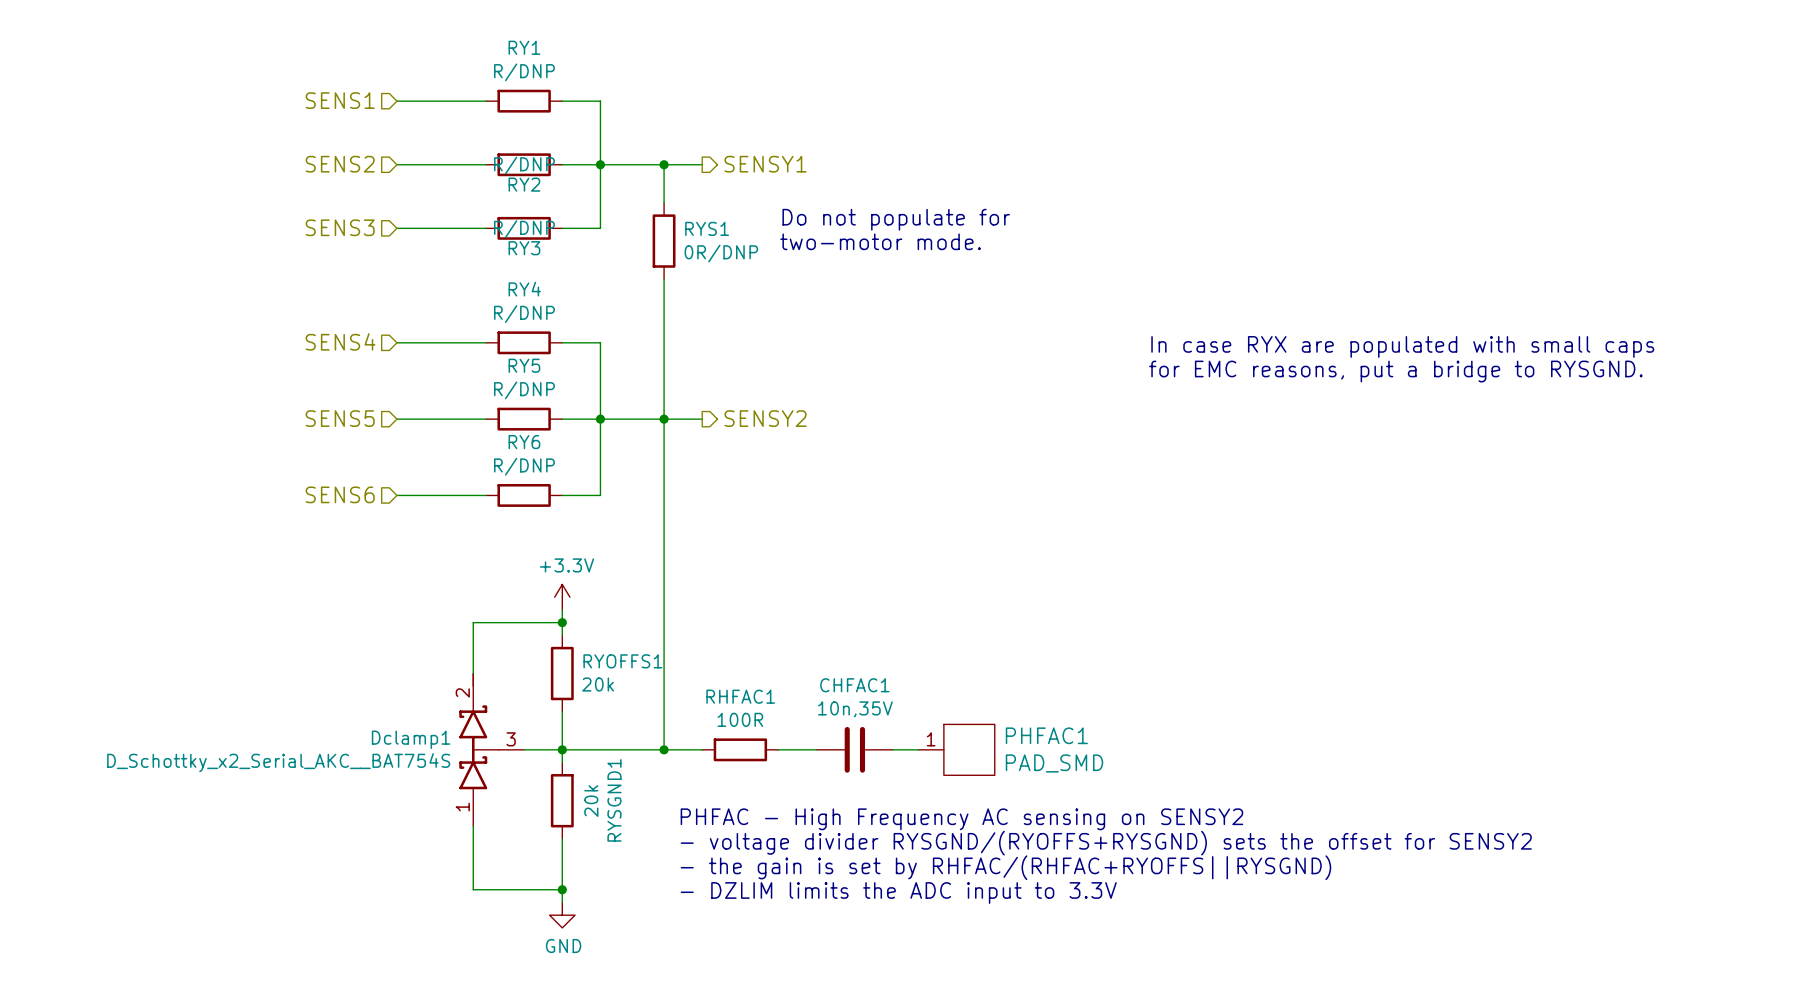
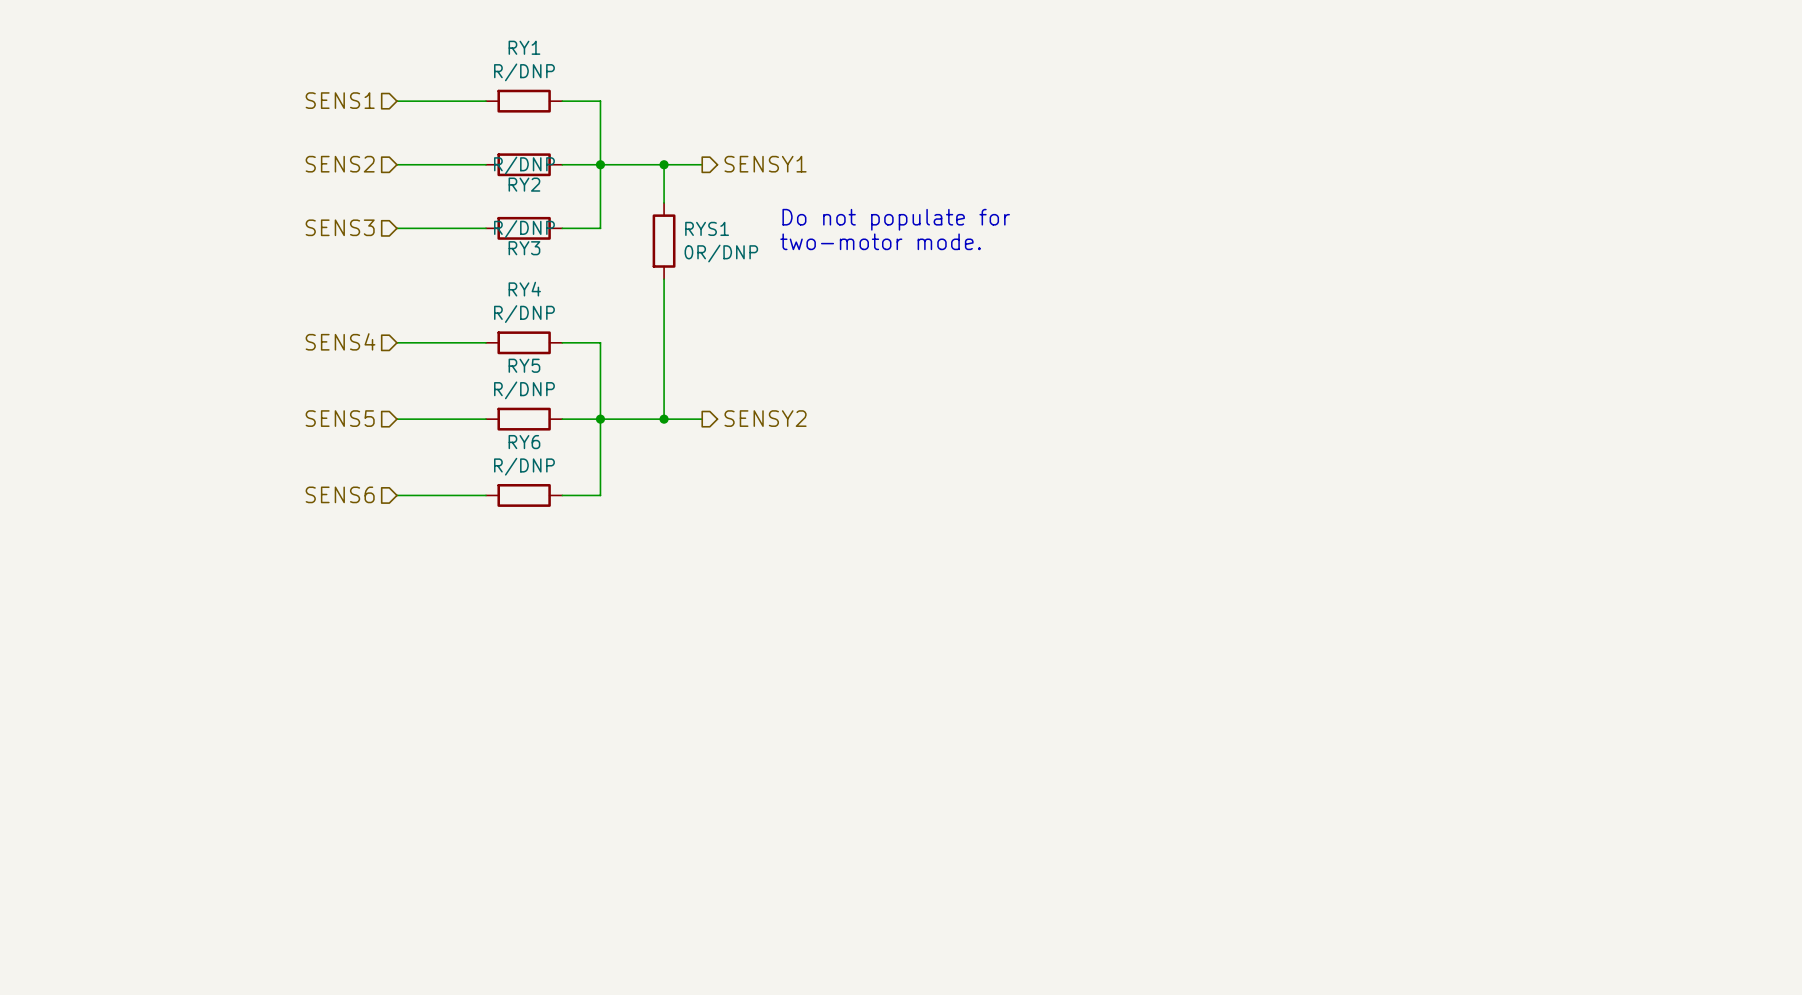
text: In case RYX are populated with small caps (1402, 346) -> none
text: for EMC reasons, put a bridge to RYSGND. (1395, 371) -> none
wire: (664, 419) (664, 749) -> none
power symbol: +3.3V (562, 597) -> none
wire: (562, 609) (562, 635) -> none
wire: (562, 622) (473, 622) (473, 673) -> none
junction: (562, 622) -> none
RYOFFS1: 20k (562, 673) -> none
wire: (562, 711) (562, 762) -> none
Dclamp1: D_Schottky_x2_Serial_AKC__BAT754S (491, 749) -> none
wire: (524, 749) (702, 749) -> none
junction: (562, 749) -> none
junction: (664, 749) -> none
RHFAC1: 100R (740, 749) -> none
wire: (778, 749) (816, 749) -> none
CHFAC1: 10n,35V (854, 749) -> none
wire: (893, 749) (918, 749) -> none
PHFAC1: PAD_SMD (956, 749) -> none
RYSGND1: 20k (562, 800) -> none
text: PHFAC - High Frequency AC sensing on SENSY2 (961, 819) -> none
wire: (473, 826) (473, 889) (562, 889) -> none
wire: (562, 838) (562, 902) -> none
text: - voltage divider RYSGND/(RYOFFS+RYSGND) sets the offset for SENSY2 (1106, 843) -> none
text: - the gain is set by RHFAC/(RHFAC+RYOFFS||RYSGND) (1005, 867) -> none
junction: (562, 889) -> none
text: - DZLIM limits the ADC input to 3.3V (898, 893) -> none
power symbol: GND (562, 915) -> none

